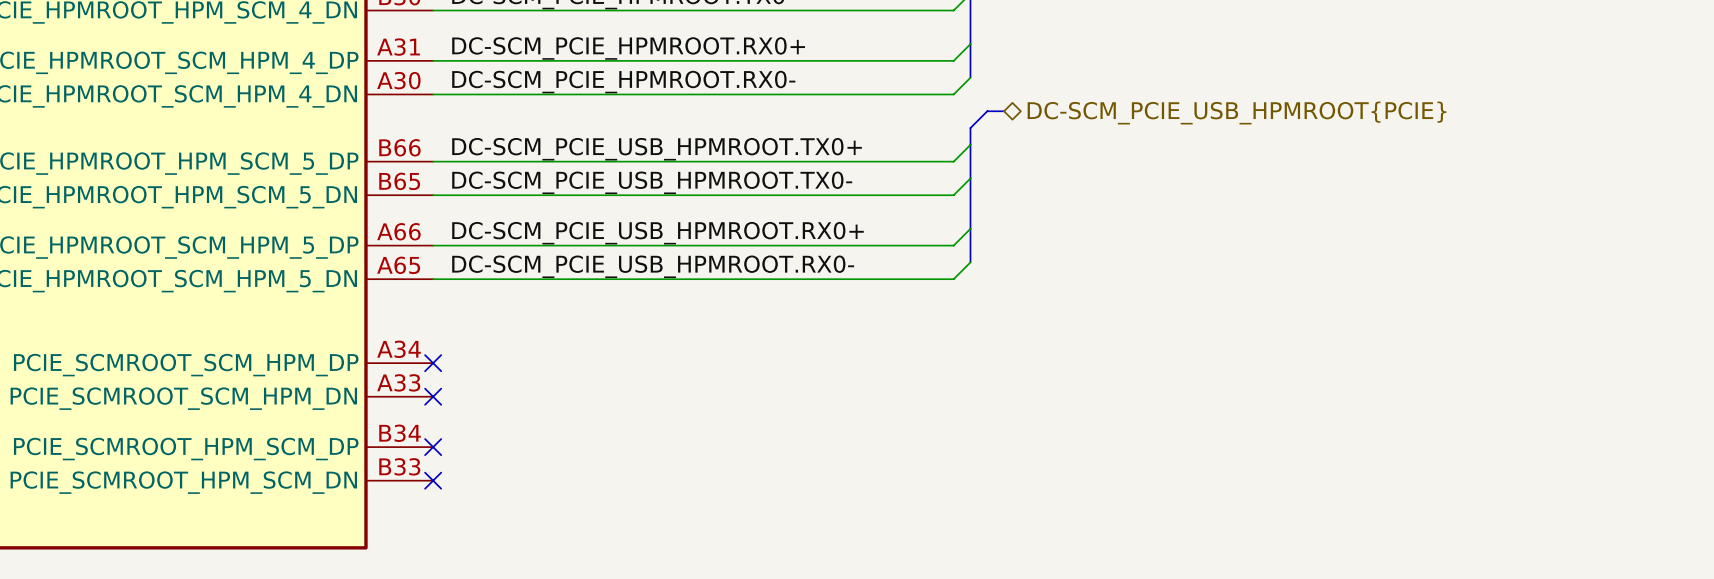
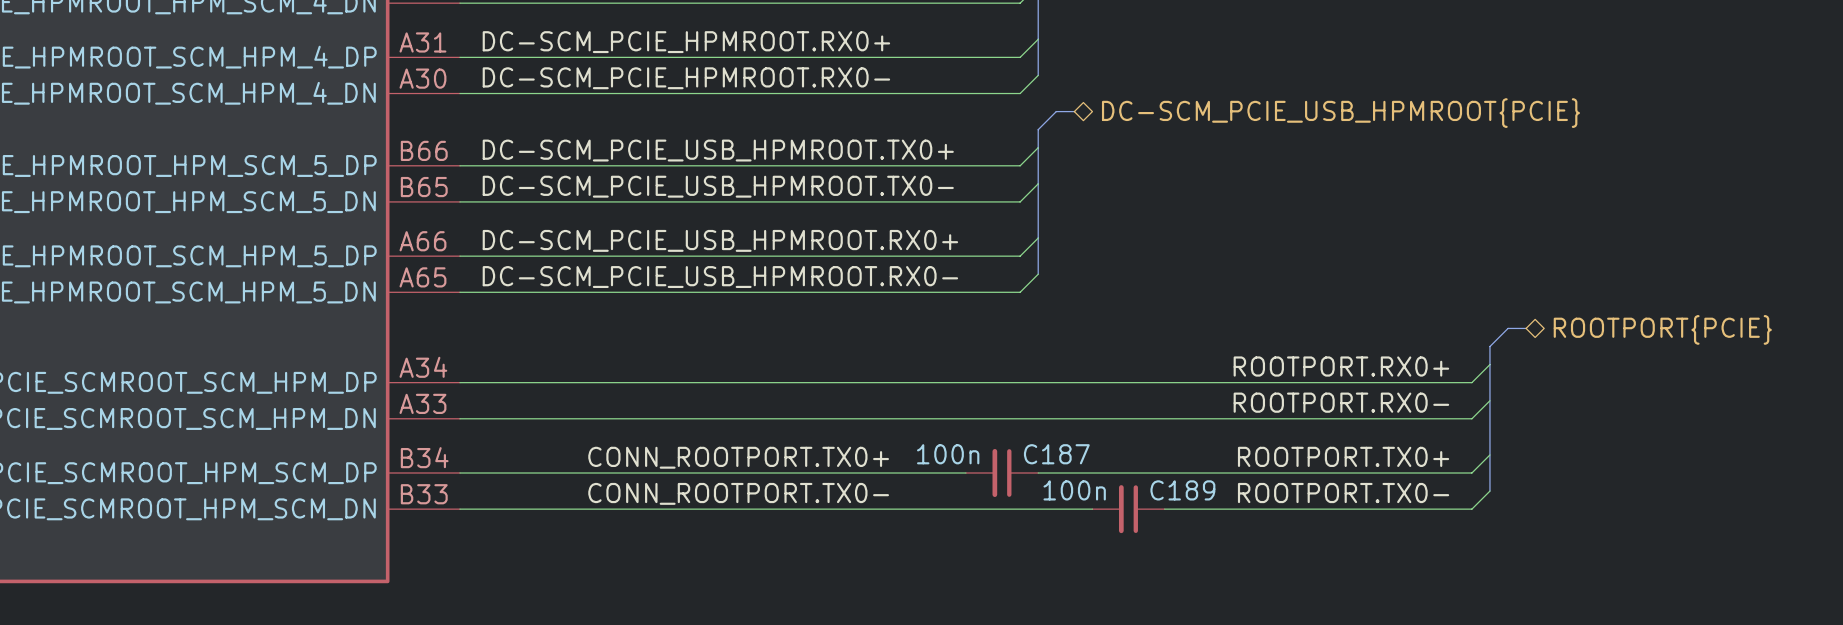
bus: none -> (1526, 328) (1508, 328) (1489, 346) (1489, 491)
hierarchical label: none -> ROOTPORT{PCIE} (1662, 329)
wire: none -> (1489, 364) (1471, 382) (459, 382)
label: none -> ROOTPORT.RX0+ (1341, 366)
no-connect mark: (433, 363) -> none
wire: none -> (1489, 400) (1471, 418) (459, 418)
label: none -> ROOTPORT.RX0- (1341, 402)
no-connect mark: (433, 396) -> none
wire: none -> (1489, 454) (1471, 473) (1038, 473)
label: none -> ROOTPORT.TX0+ (1343, 456)
label: none -> CONN_ROOTPORT.TX0+ (738, 457)
wire: none -> (459, 473) (965, 473)
no-connect mark: (433, 447) -> none
C187: none -> (1002, 473)
wire: none -> (1489, 491) (1471, 509) (1164, 509)
label: none -> ROOTPORT.TX0- (1343, 493)
label: none -> CONN_ROOTPORT.TX0- (738, 493)
wire: none -> (459, 509) (1092, 509)
no-connect mark: (433, 480) -> none
C189: none -> (1128, 509)

